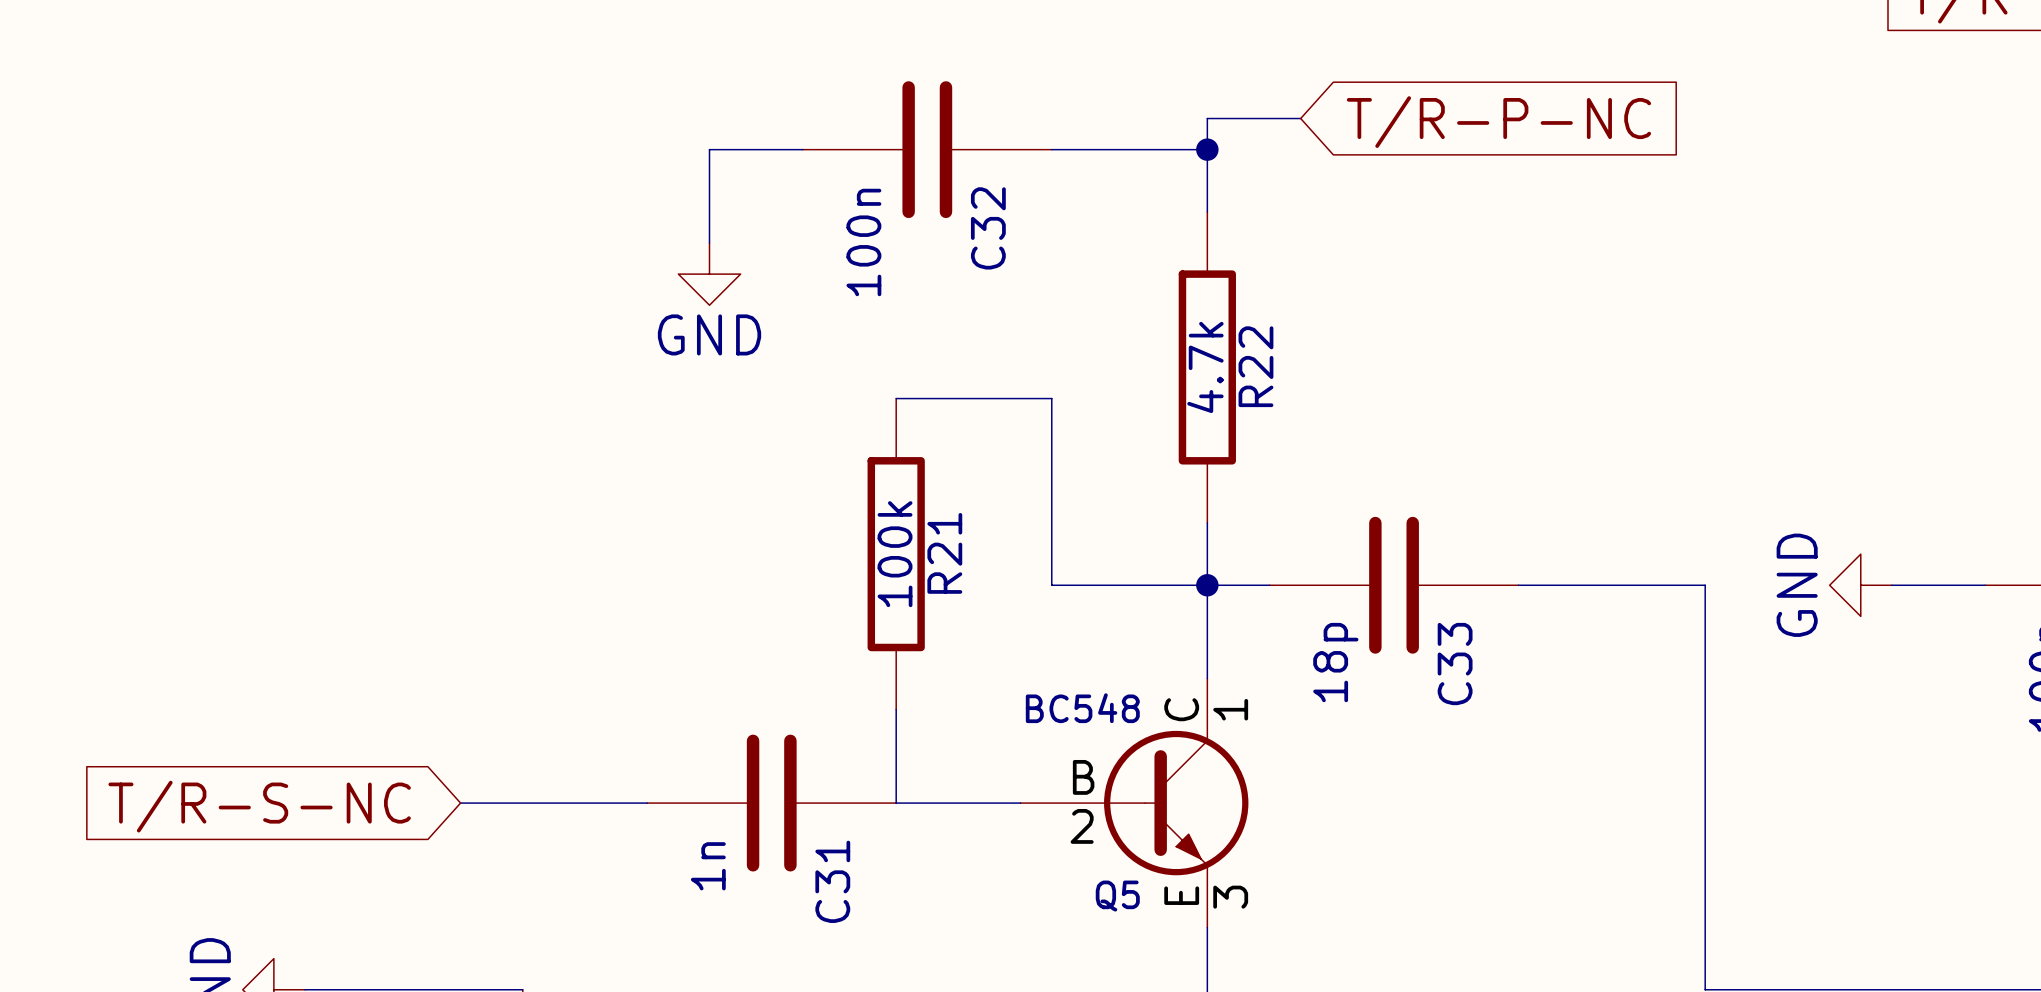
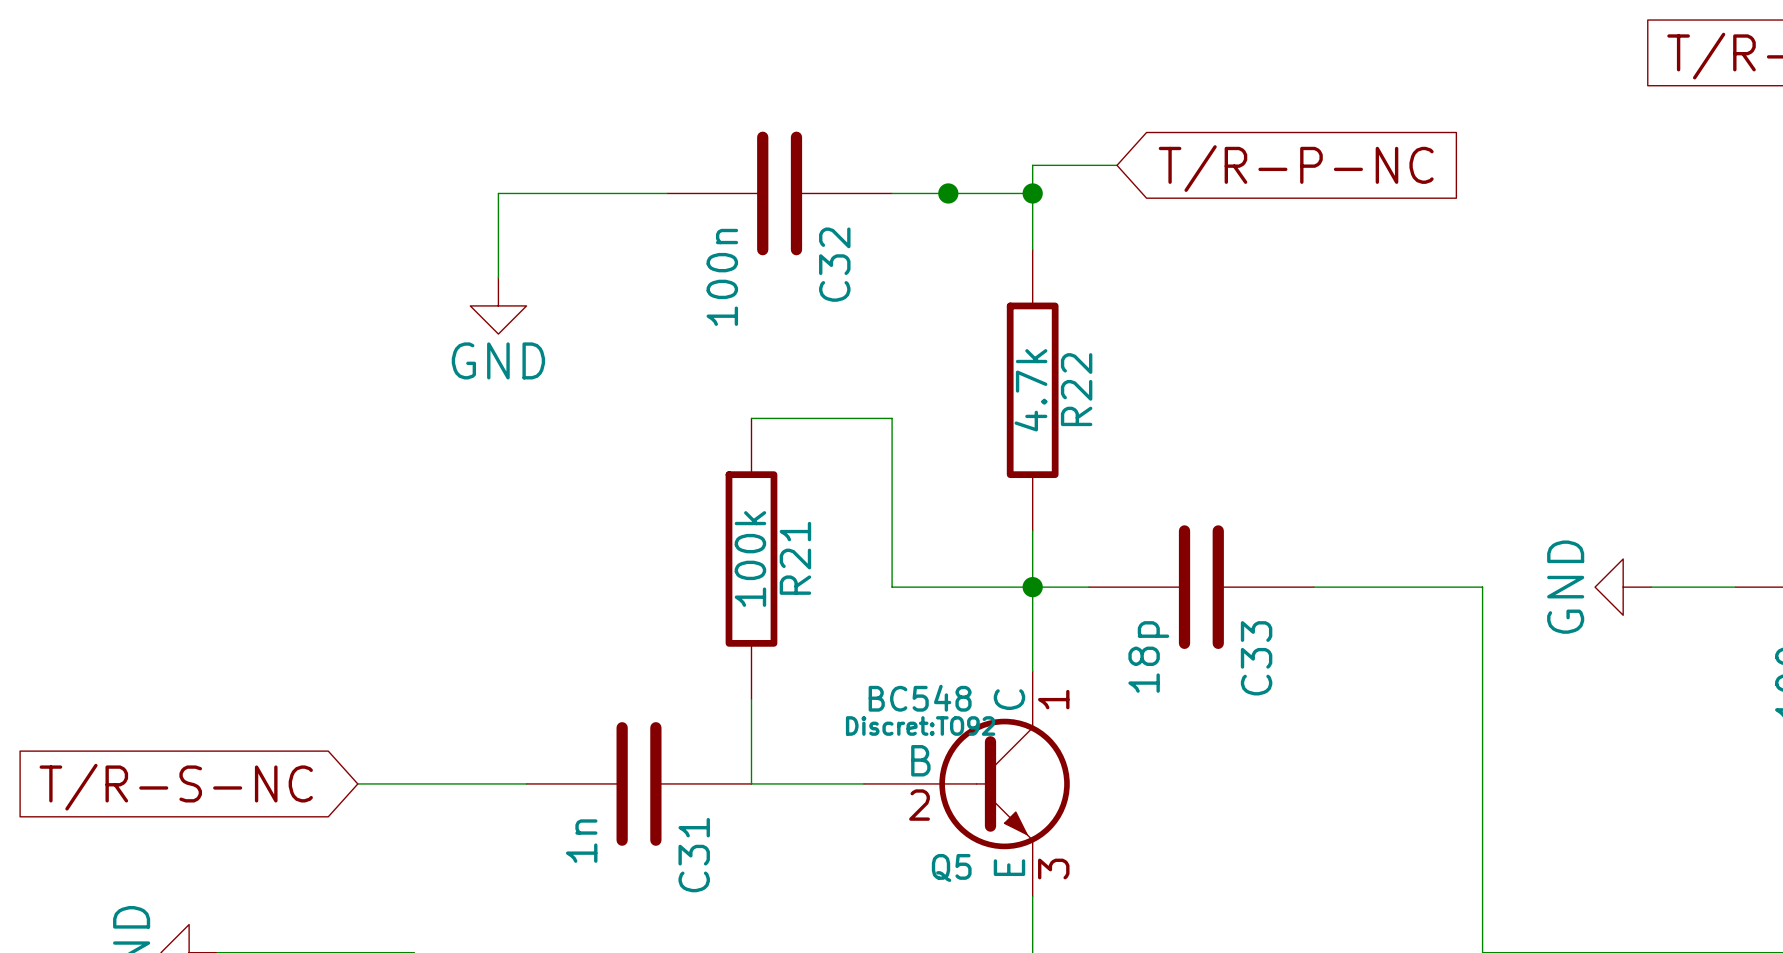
wire: (709, 149) (709, 242) -> (582, 193) (498, 193) (498, 277)
junction: none -> (948, 193)
power symbol position: GND (709, 274) -> GND (498, 305)
Q5 text: none -> Discret:TO92 (920, 725)

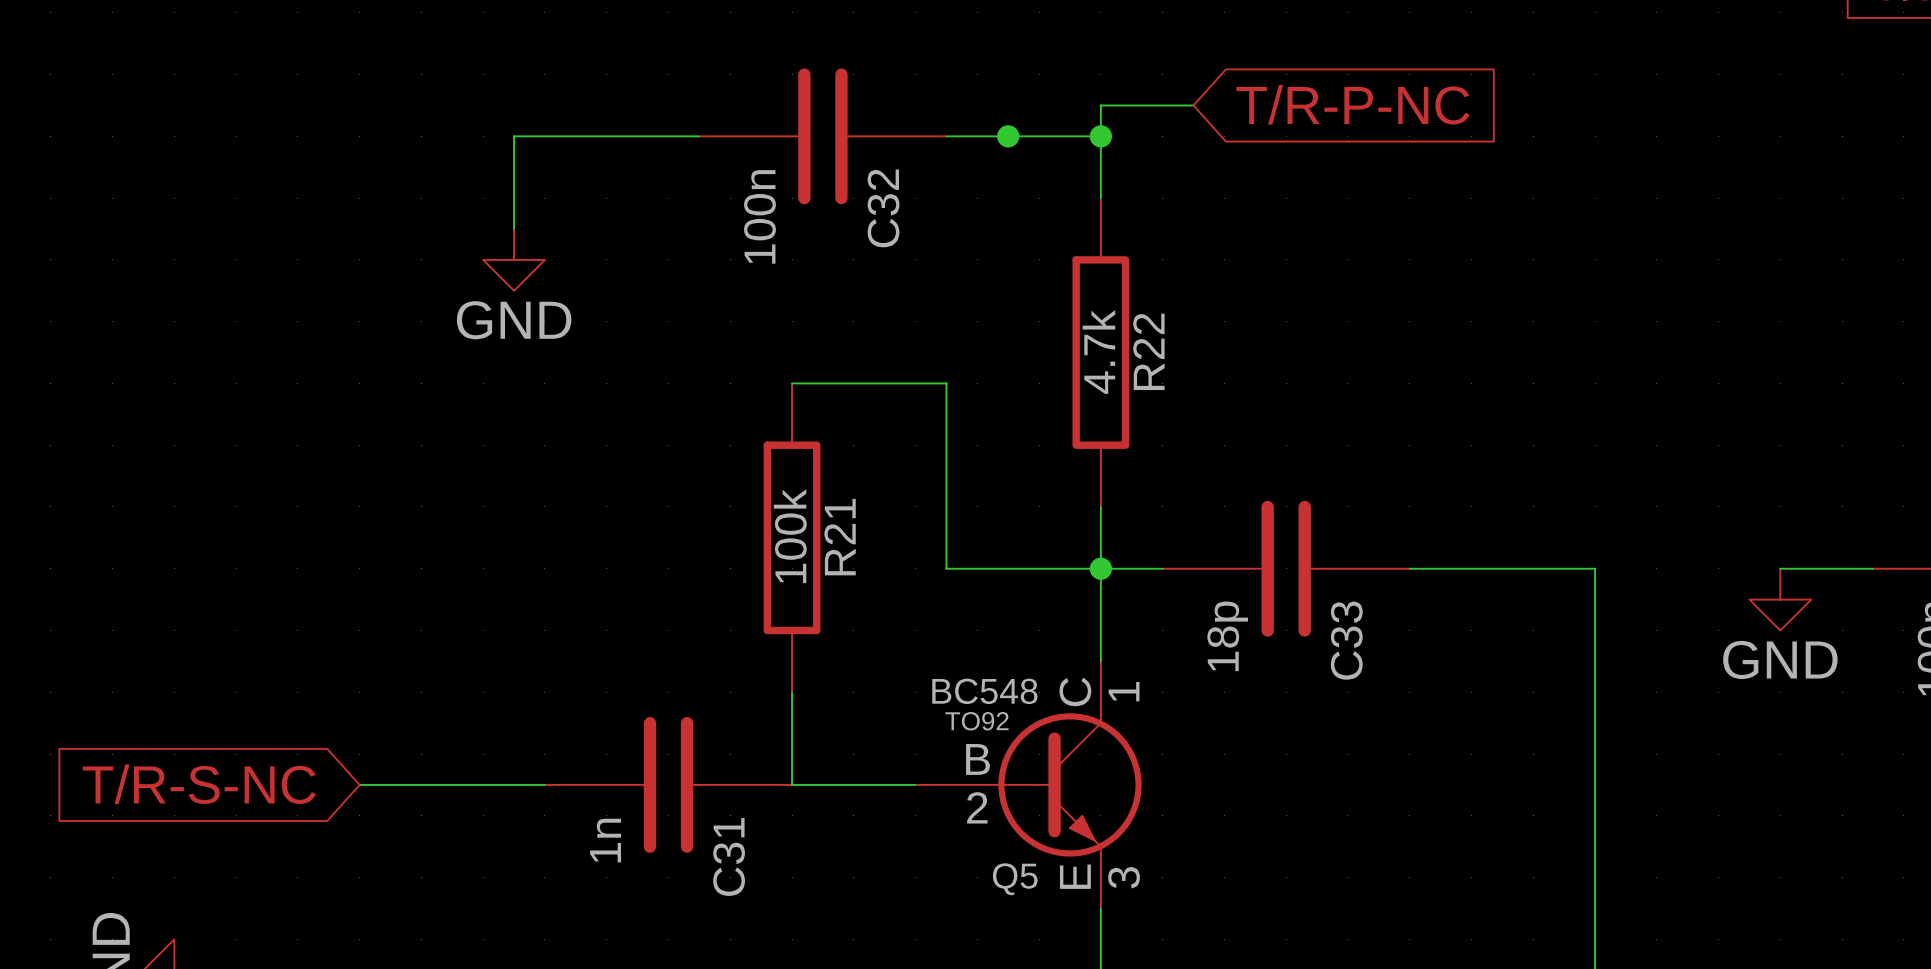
power symbol rotation: 0° (1623, 587) -> 90° counterclockwise (1780, 599)
power symbol position: GND (1623, 587) -> GND (1780, 599)
Q5 text: Discret:TO92 (920, 725) -> TO92 (976, 721)

